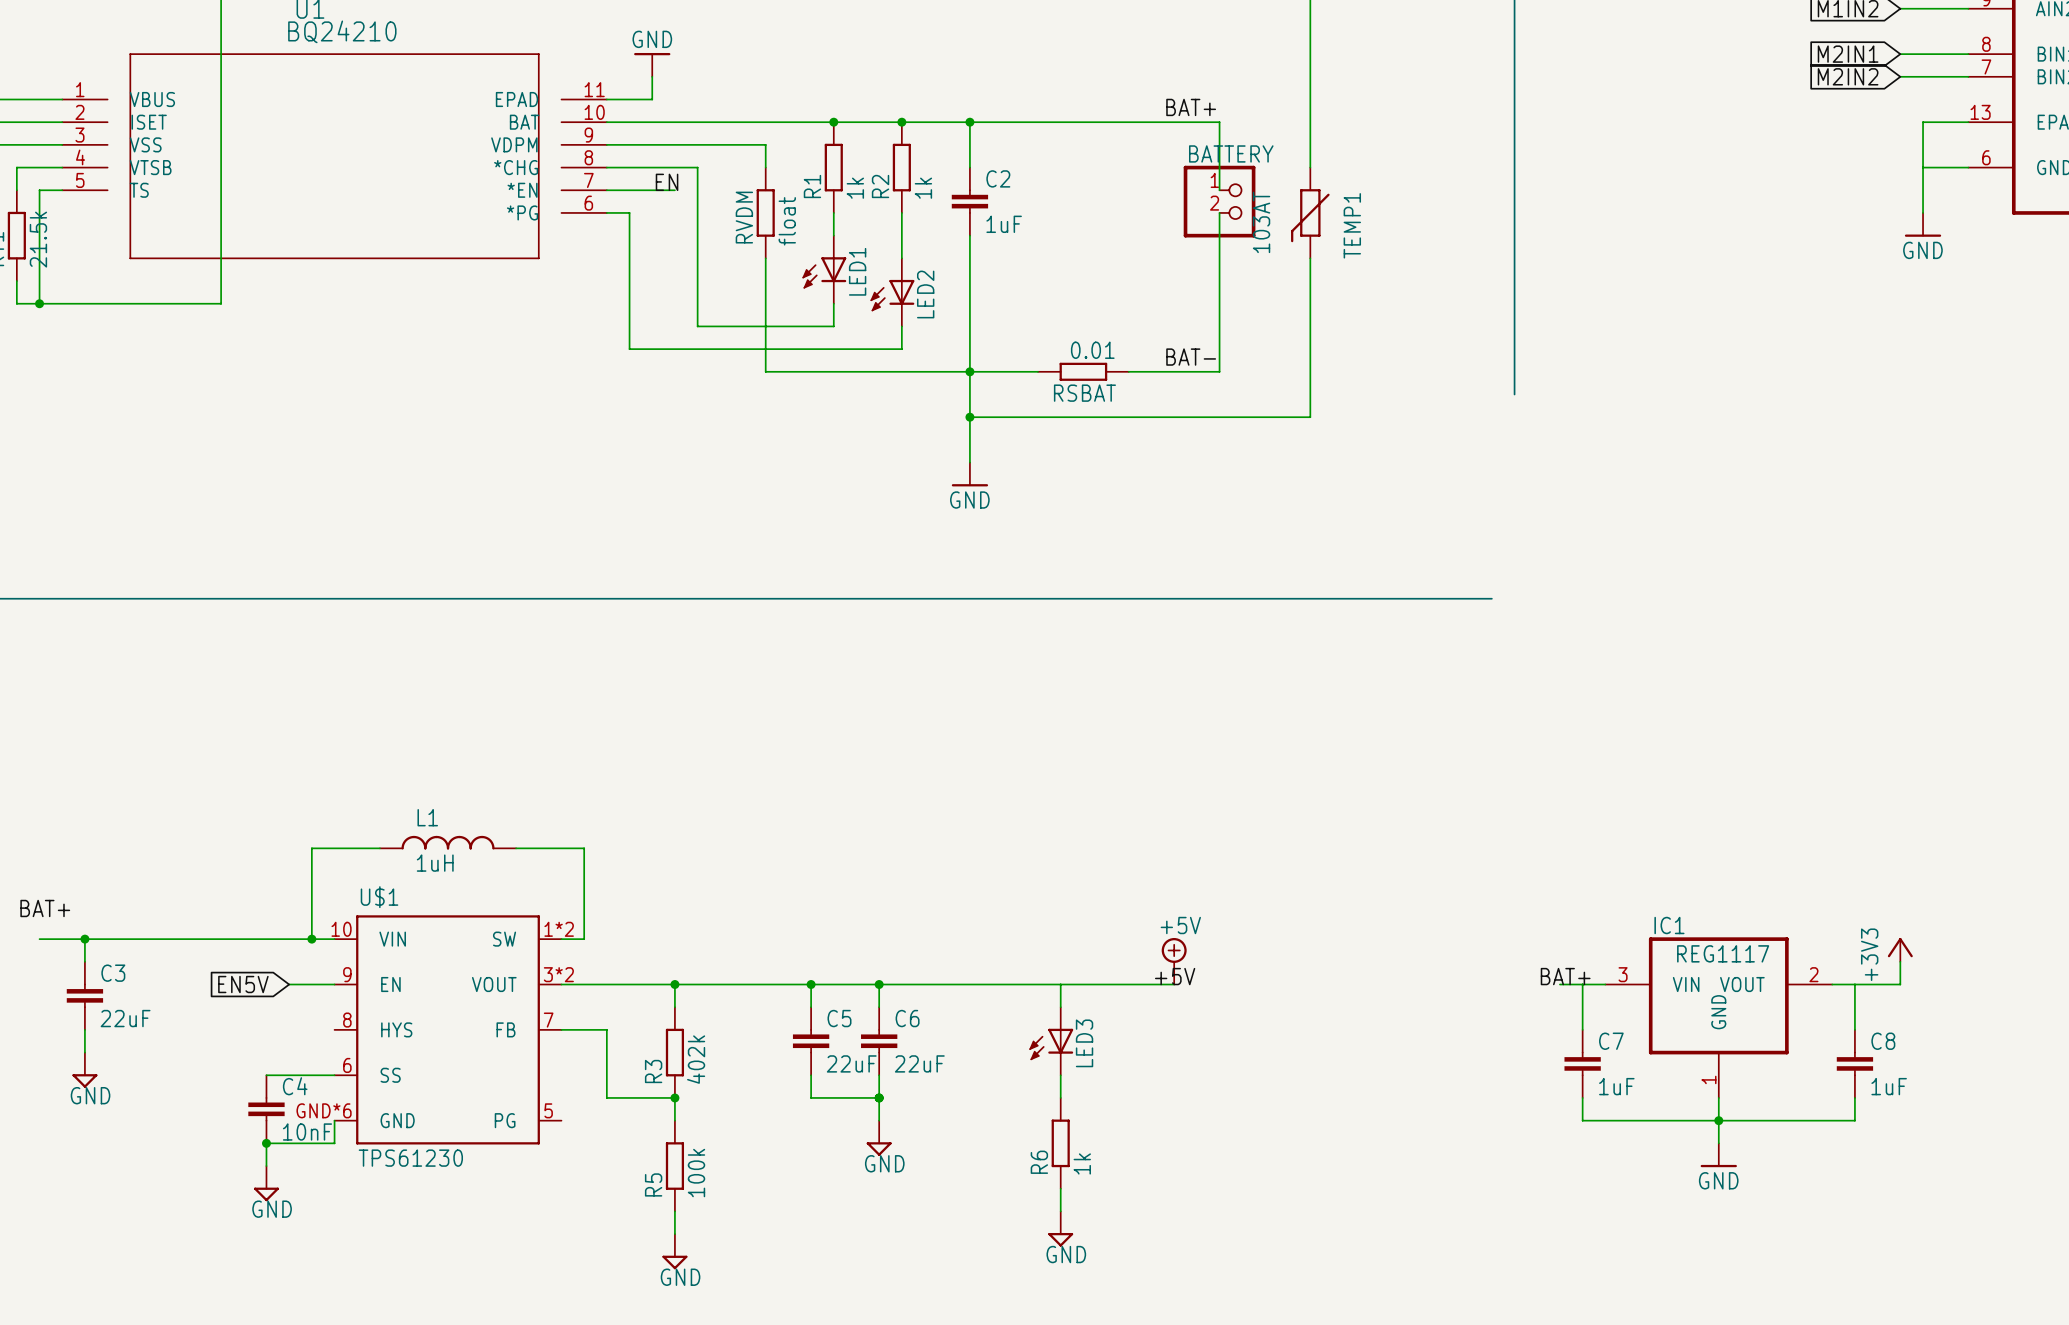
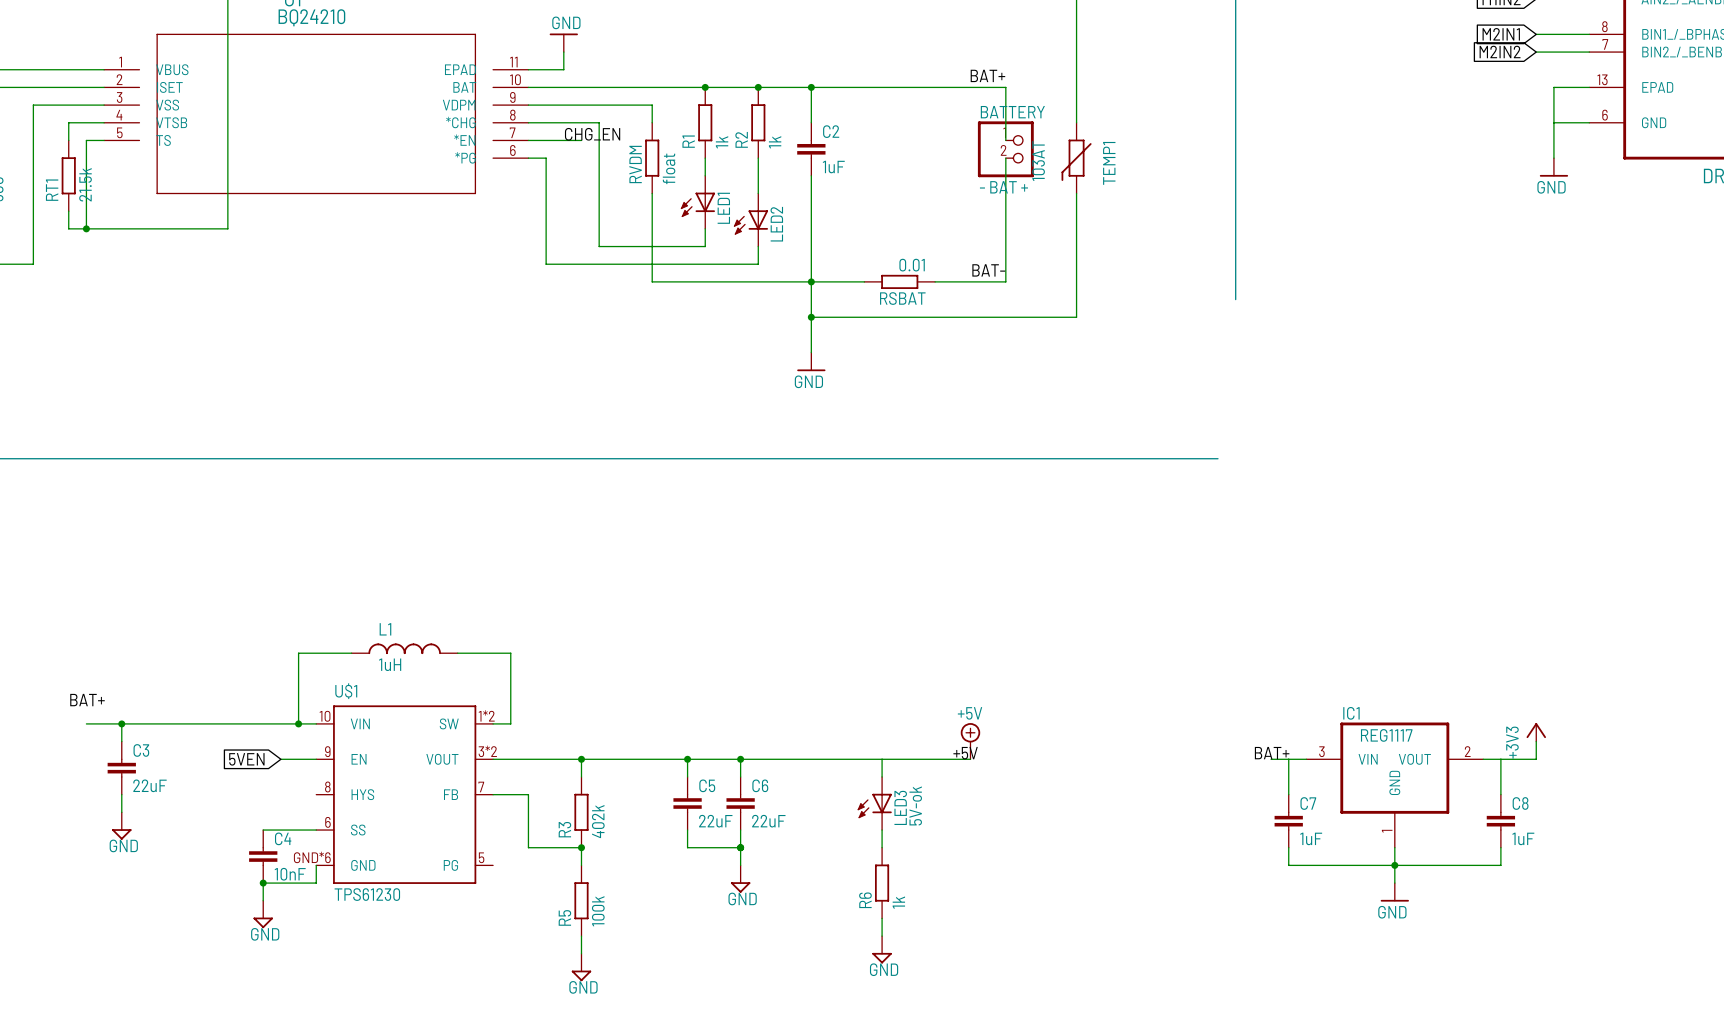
label: EN (667, 182) -> CHG_EN (592, 134)
BATTERY value: none -> - BAT + (1003, 187)
global label: EN5V (243, 984) -> 5VEN (246, 759)
LED3 value: none -> 5V-ok (915, 805)

